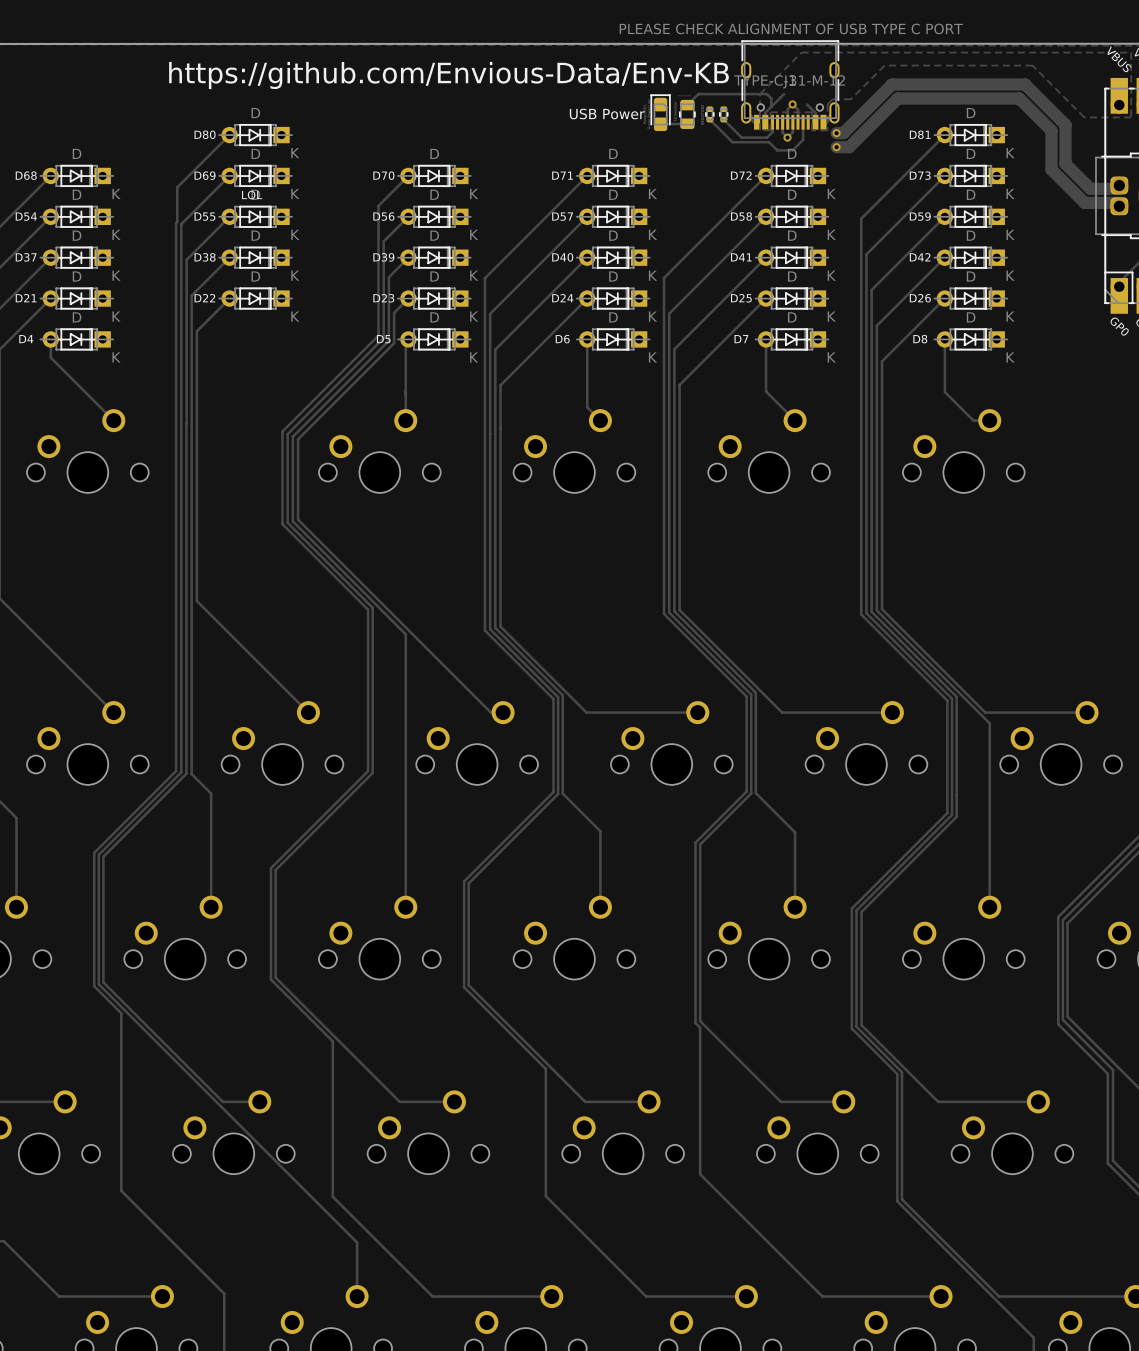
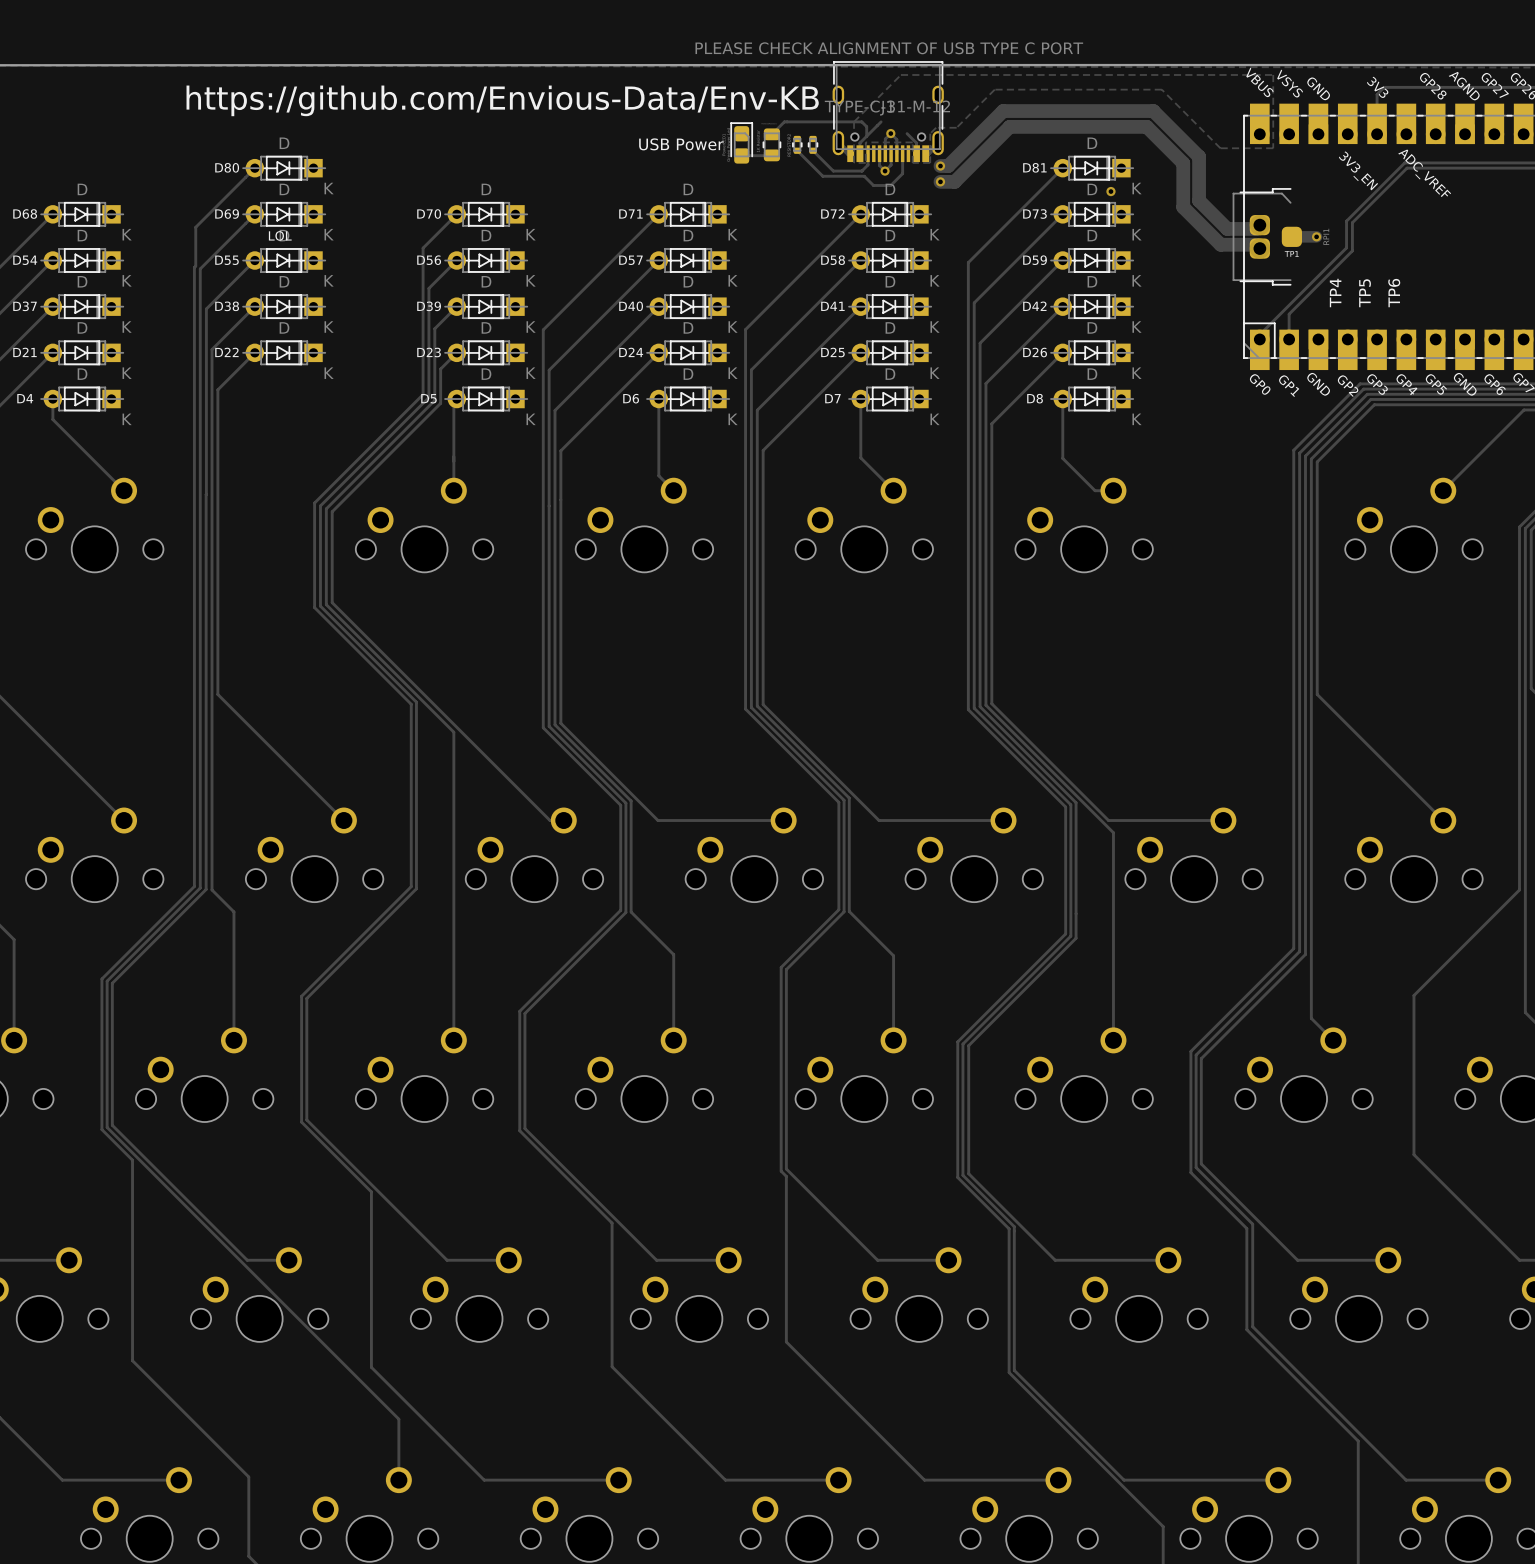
via: none -> (1110, 191)

